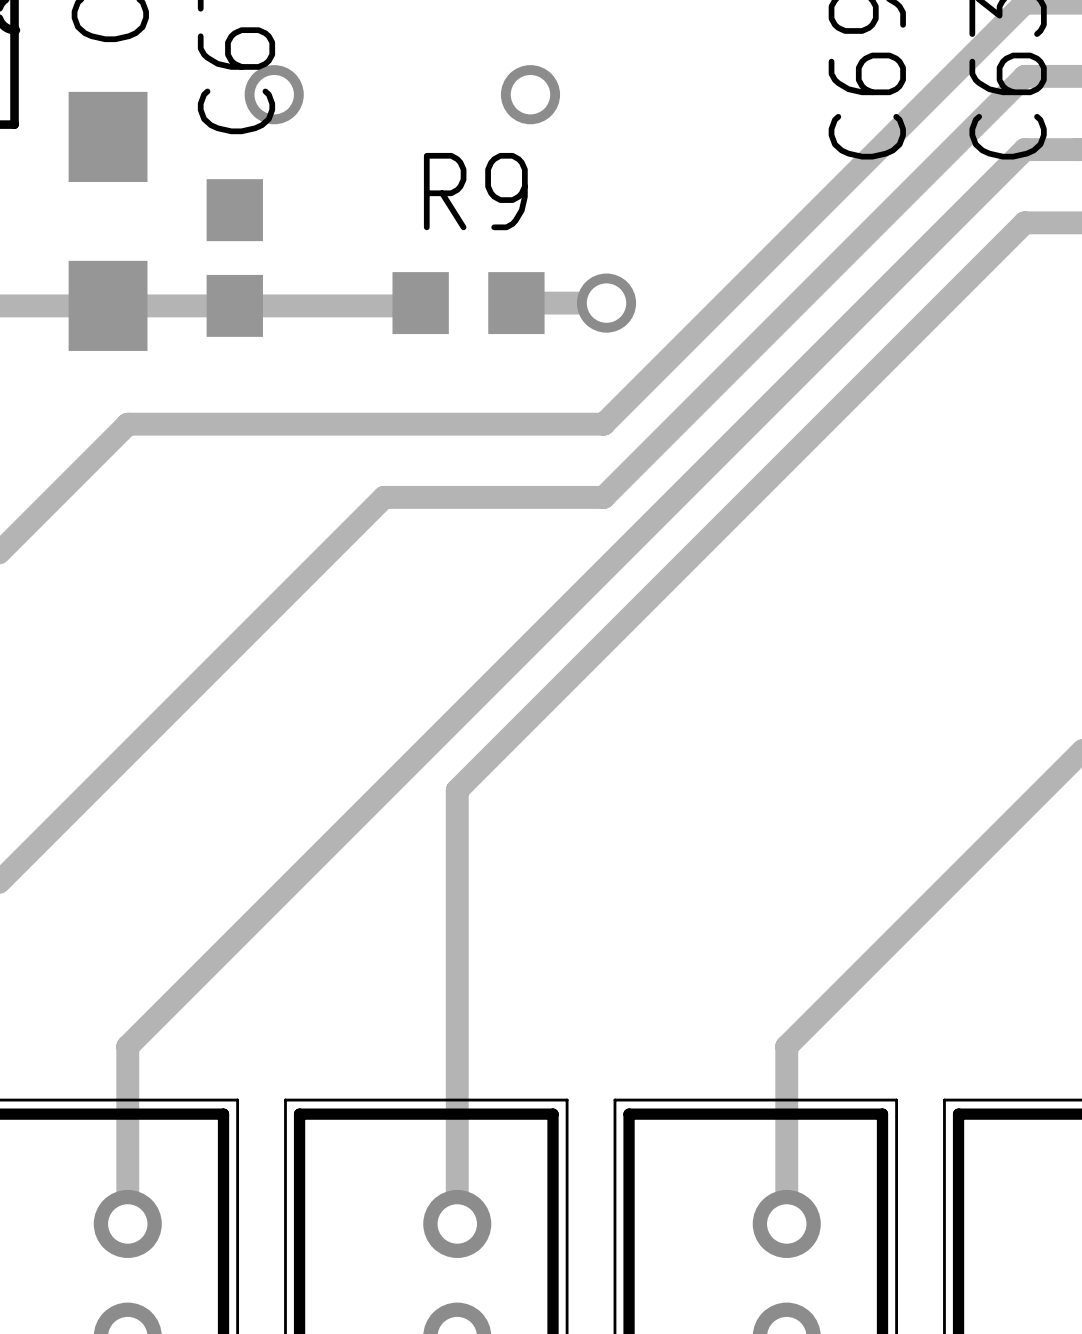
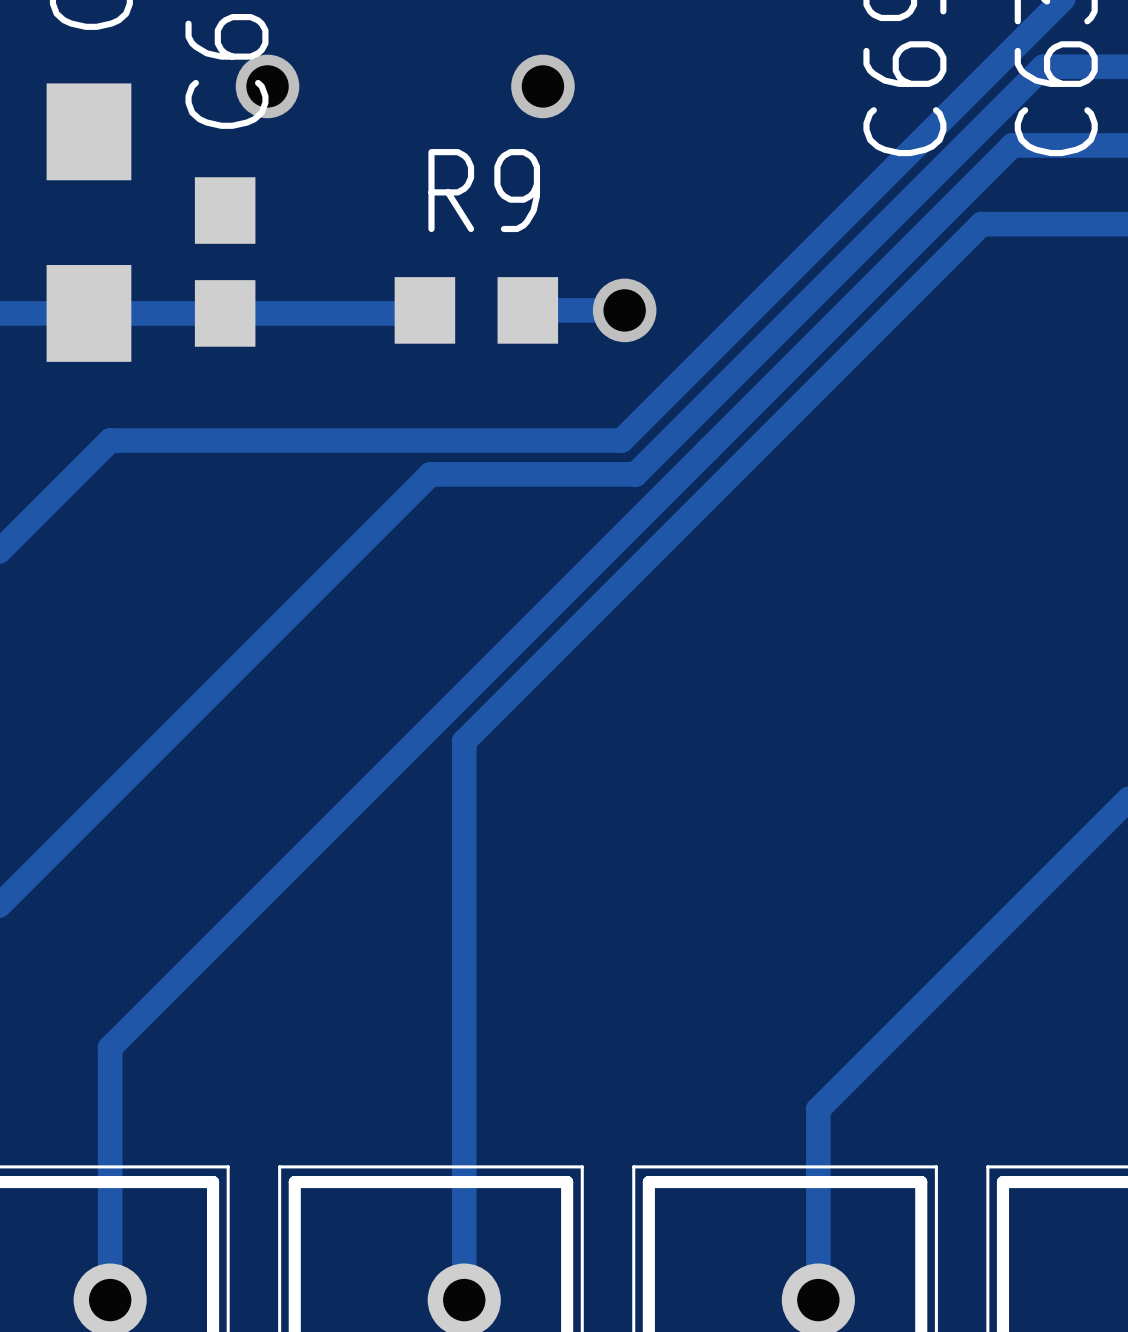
track: (1024, 76) (603, 497) (384, 497) -> (1074, 66) (1043, 66) (635, 474) (430, 474) (385, 519)
track: (1024, 149) (127, 1046) -> (1074, 145) (1012, 145) (110, 1047) (110, 1109)
track: (1024, 222) (457, 790) -> (1074, 224) (981, 224) (464, 741) (464, 833)

